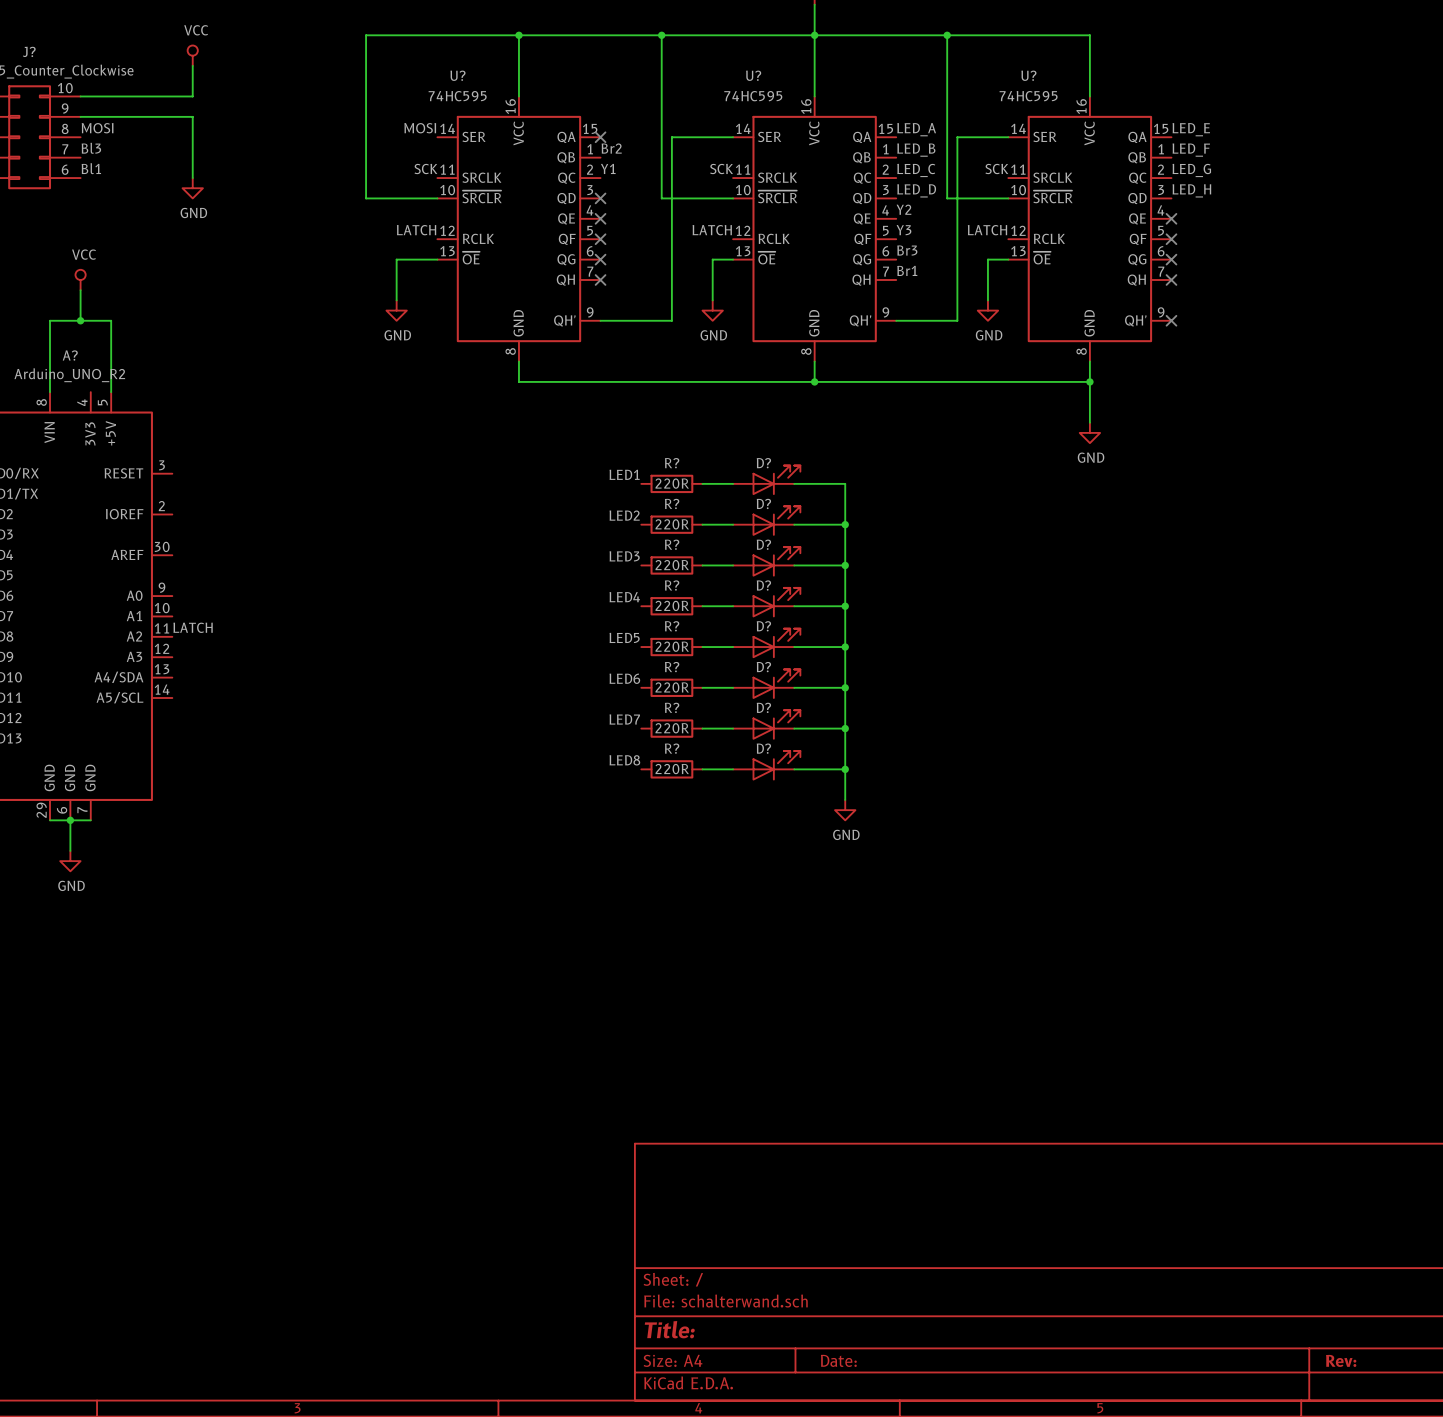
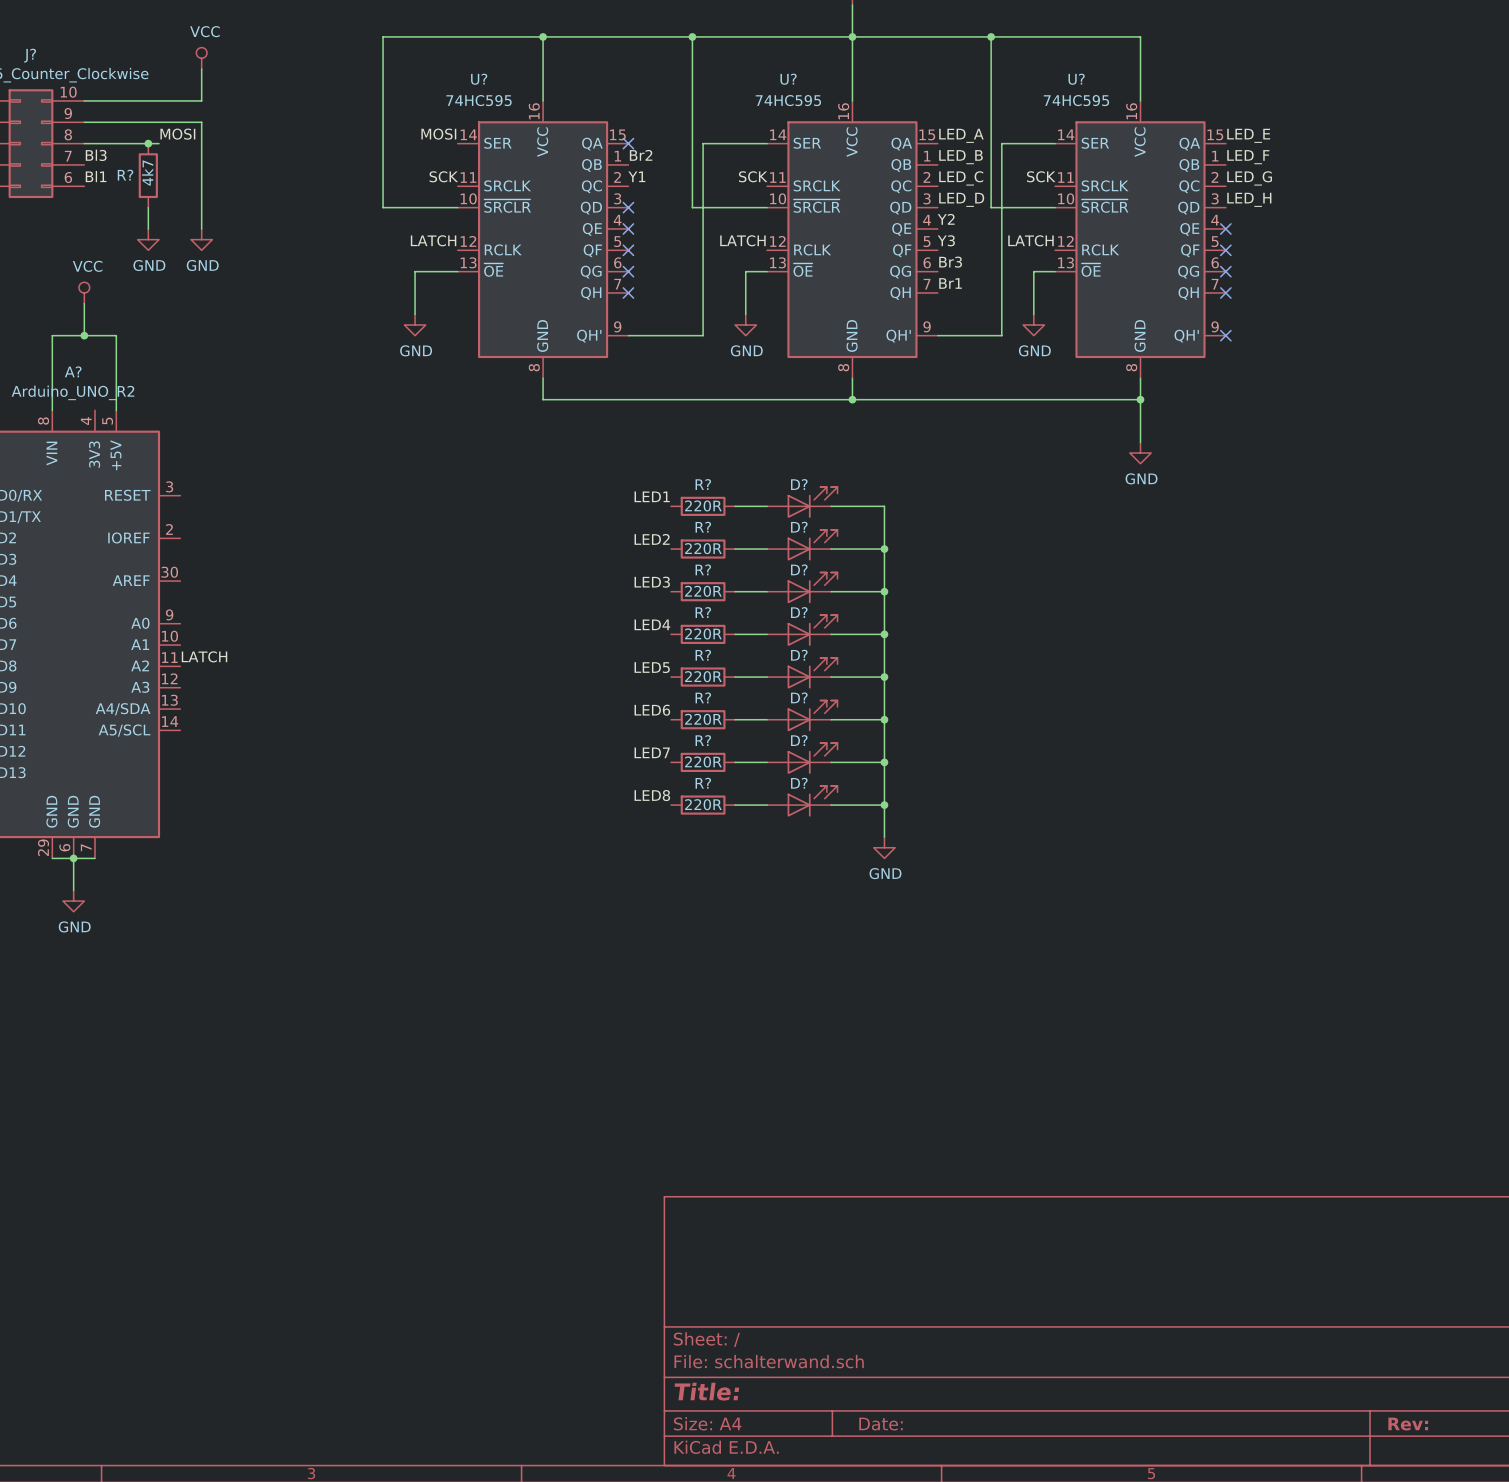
label position: MOSI (97, 128) -> MOSI (177, 134)
wire: none -> (84, 143) (159, 143)
junction: none -> (148, 143)
R?: none -> 4k7 (148, 175)
wire: none -> (201, 186) (201, 228)
power symbol: GND (192, 188) -> none
wire: none -> (148, 207) (148, 228)
power symbol: none -> GND (148, 239)
power symbol: none -> GND (201, 239)

